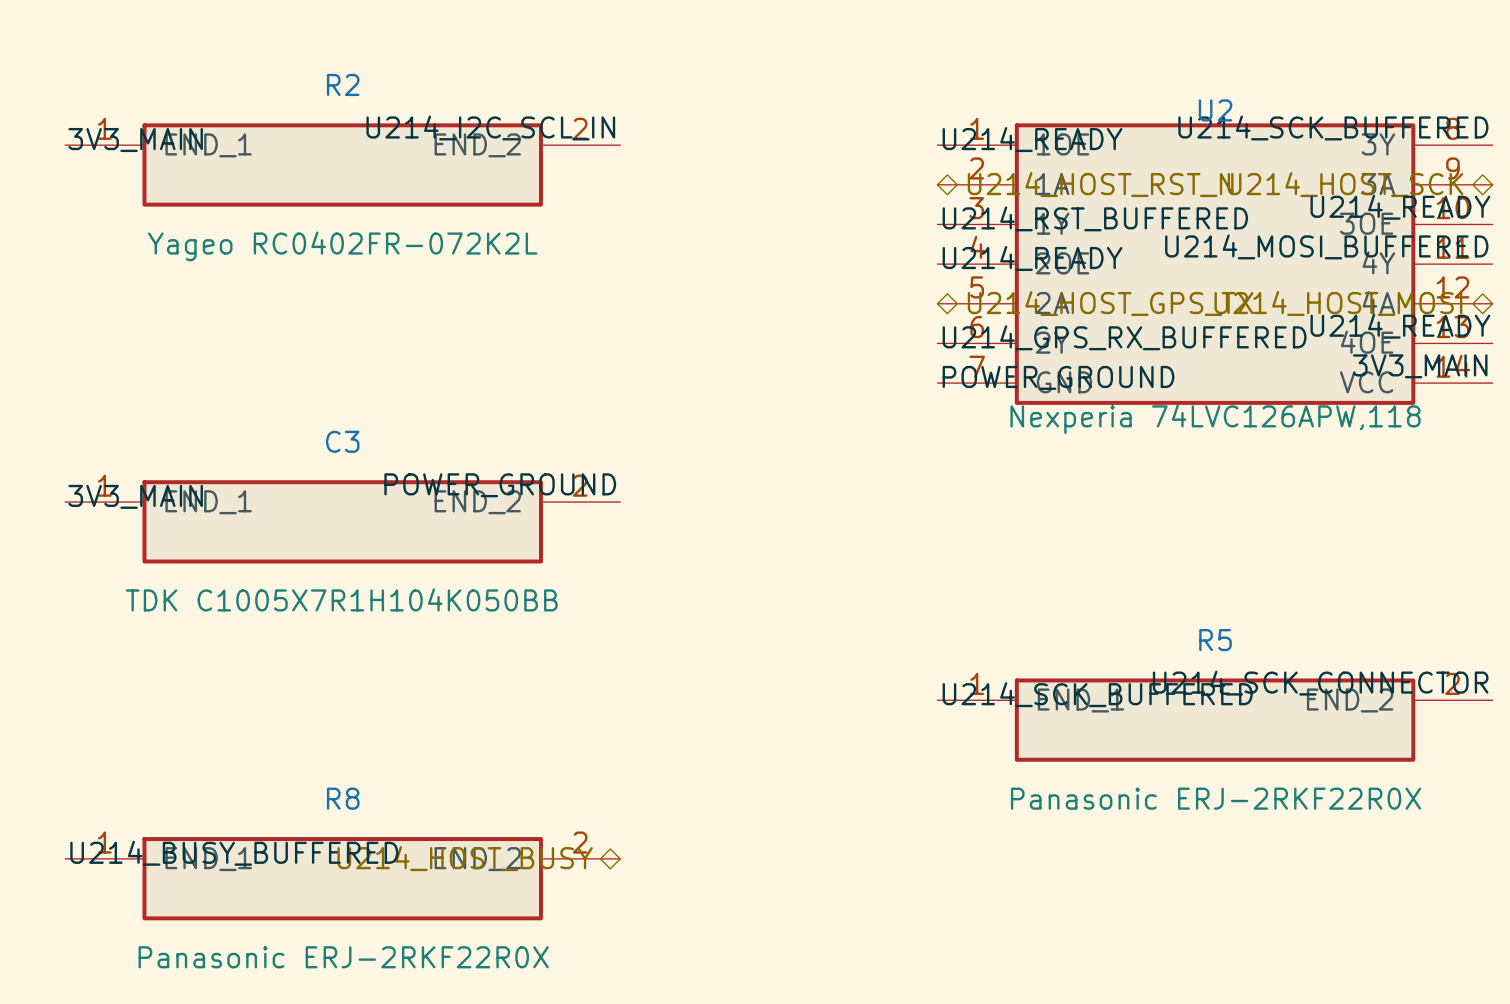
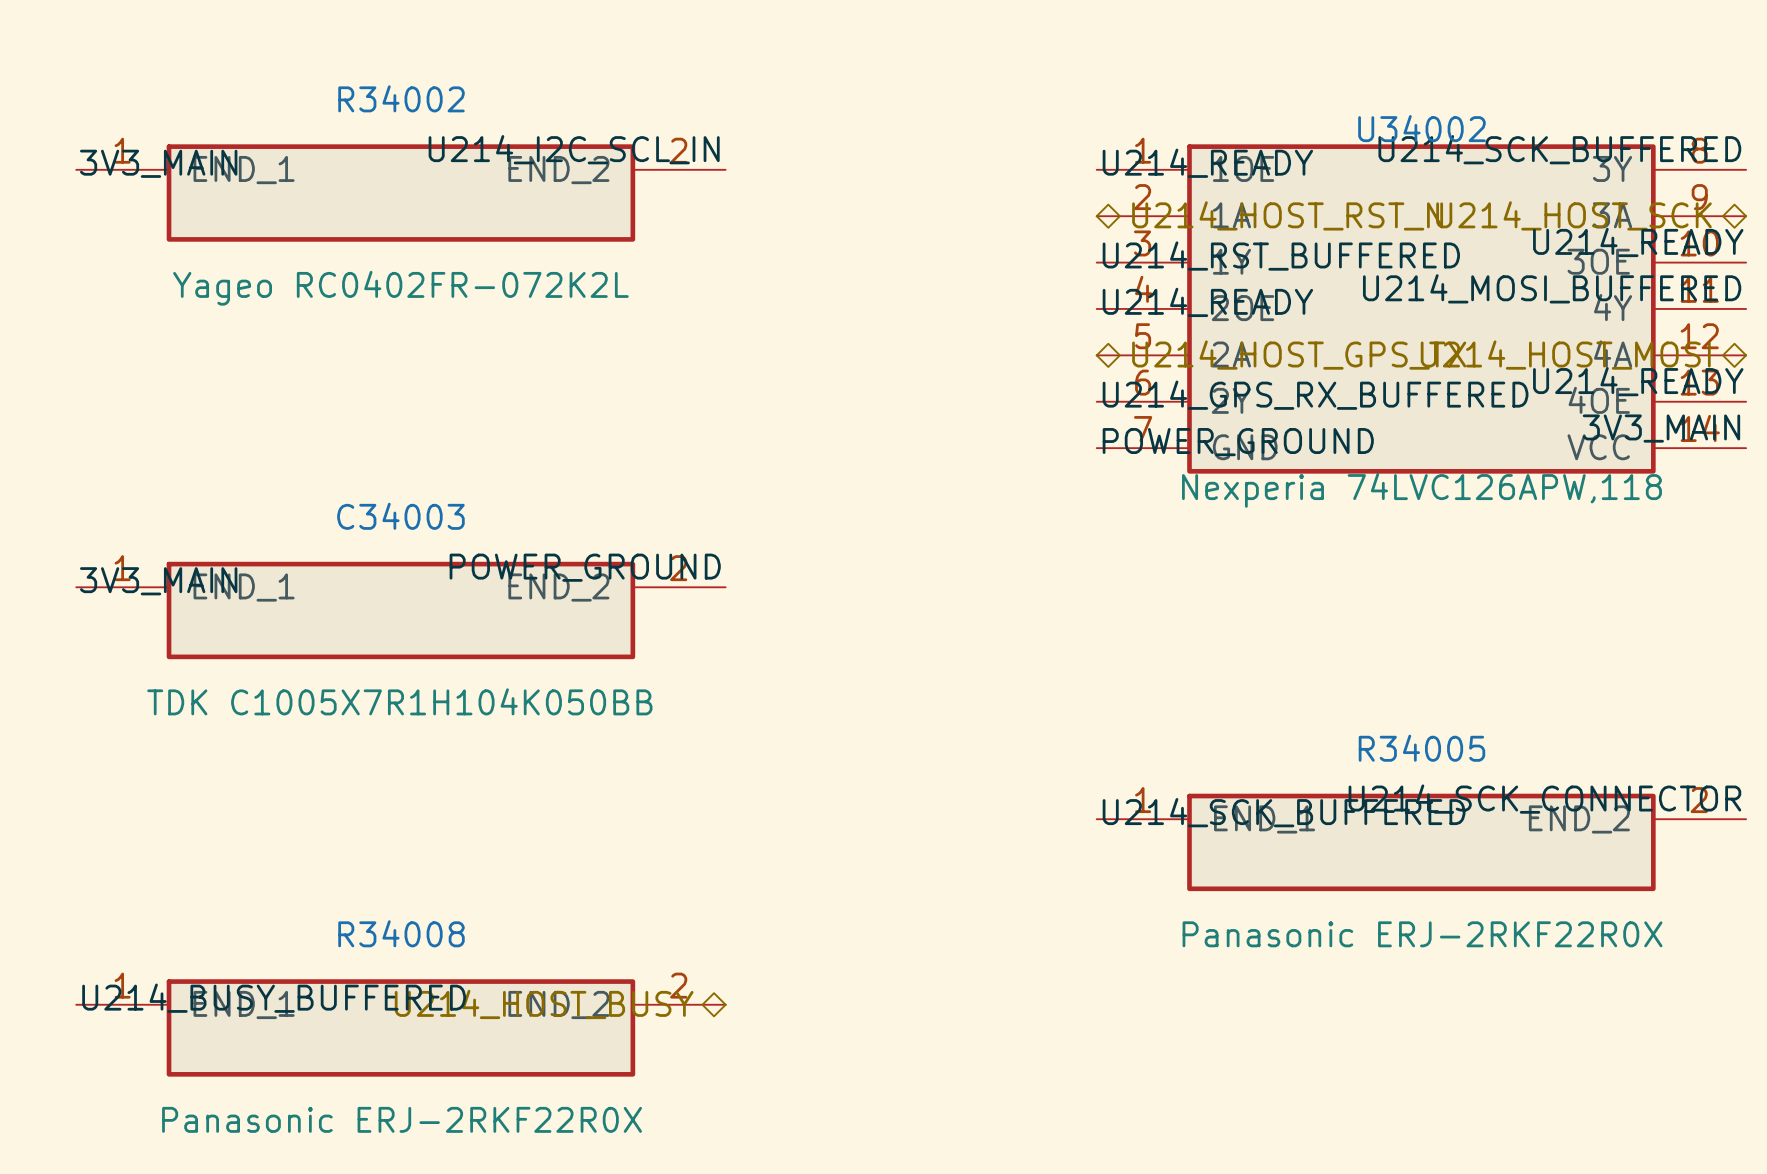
R2 name: R2 (343, 84) -> R34002 (401, 98)
U2 name: U2 (1215, 110) -> U34002 (1421, 128)
C3 name: C3 (342, 441) -> C34003 (400, 516)
R5 name: R5 (1215, 640) -> R34005 (1421, 748)
R8 name: R8 (343, 798) -> R34008 (401, 933)

